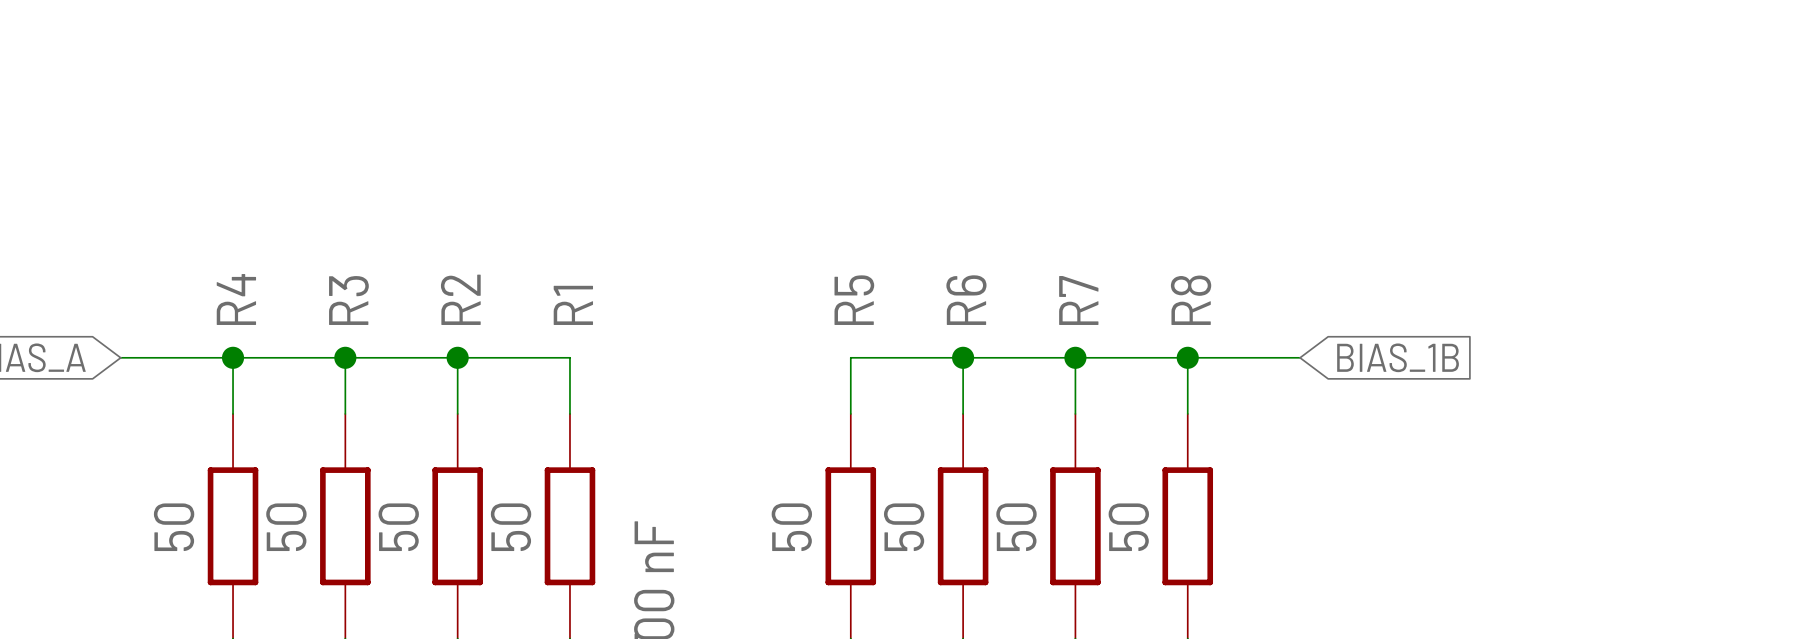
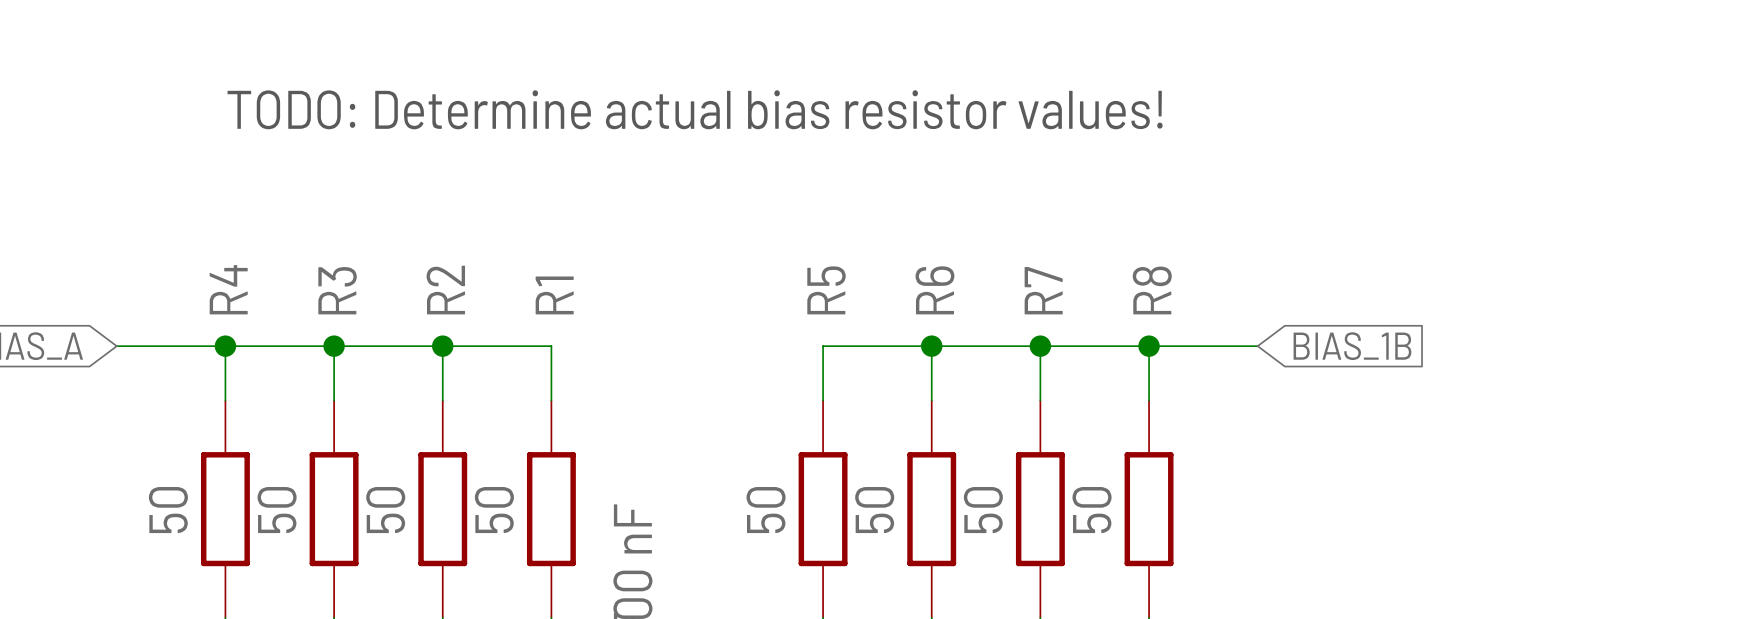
text: none -> TODO: Determine actual bias resistor values! (695, 109)

